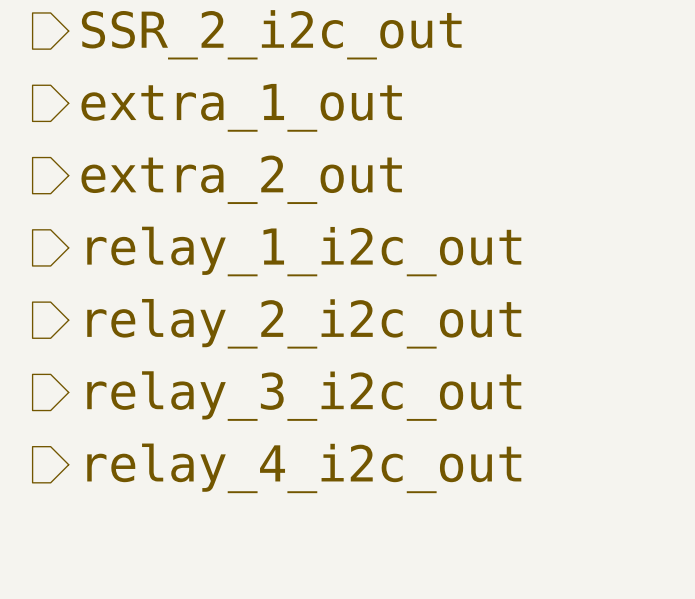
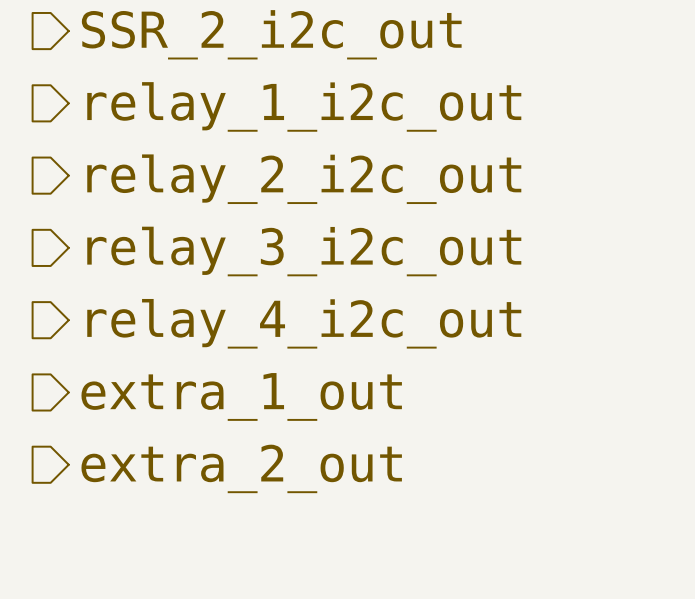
hierarchical label: extra_1_out (241, 107) -> relay_1_i2c_out (304, 106)
hierarchical label: extra_2_out (241, 179) -> relay_2_i2c_out (304, 179)
hierarchical label: relay_1_i2c_out (304, 251) -> relay_3_i2c_out (304, 251)
hierarchical label: relay_2_i2c_out (304, 323) -> relay_4_i2c_out (304, 323)
hierarchical label: relay_3_i2c_out (304, 396) -> extra_1_out (241, 396)
hierarchical label: relay_4_i2c_out (304, 468) -> extra_2_out (241, 468)

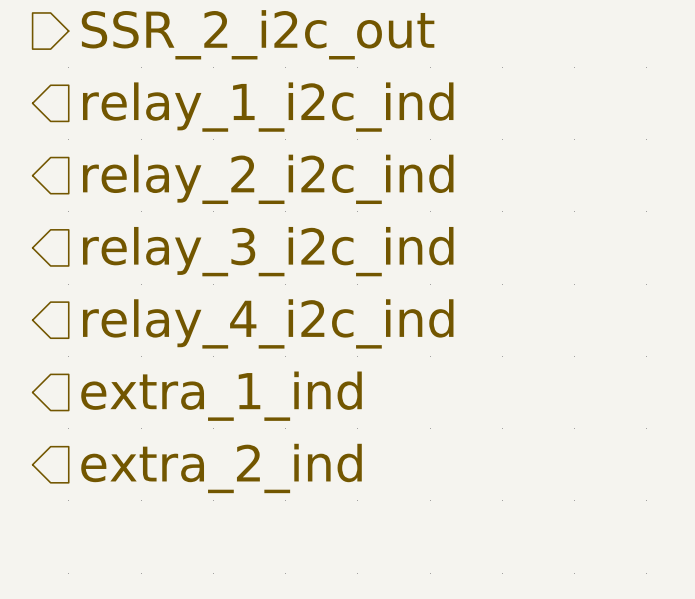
hierarchical label shape: output (304, 106) -> input (268, 107)
hierarchical label: relay_1_i2c_out (304, 106) -> relay_1_i2c_ind (268, 107)
hierarchical label shape: output (304, 179) -> input (268, 179)
hierarchical label: relay_2_i2c_out (304, 179) -> relay_2_i2c_ind (268, 179)
hierarchical label shape: output (304, 251) -> input (268, 251)
hierarchical label: relay_3_i2c_out (304, 251) -> relay_3_i2c_ind (268, 251)
hierarchical label shape: output (304, 323) -> input (268, 323)
hierarchical label: relay_4_i2c_out (304, 323) -> relay_4_i2c_ind (268, 323)
hierarchical label shape: output (241, 396) -> input (221, 396)
hierarchical label: extra_1_out (241, 396) -> extra_1_ind (221, 396)
hierarchical label shape: output (241, 468) -> input (221, 468)
hierarchical label: extra_2_out (241, 468) -> extra_2_ind (221, 468)

